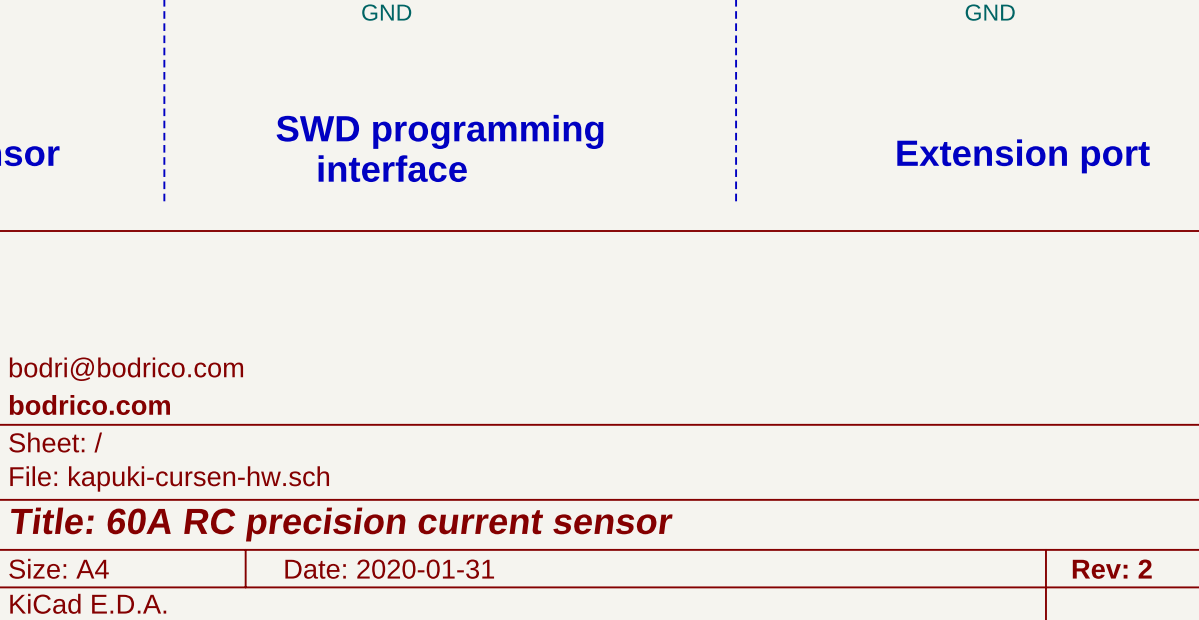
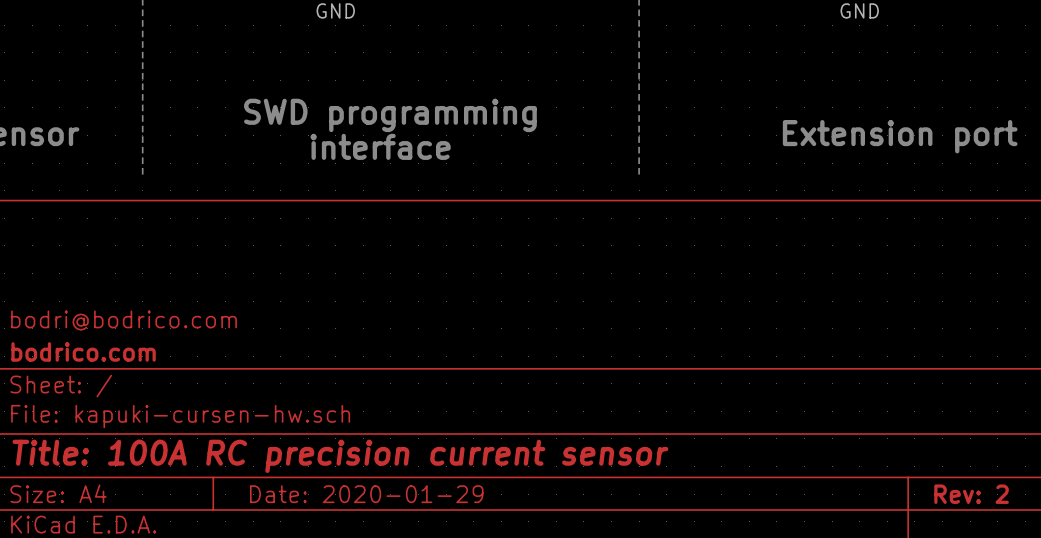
title block: Title: 60A RC precision current sensor (341, 524) -> Title: 100A RC precision current sensor (340, 456)
title block: Date: 2020-01-31 (389, 569) -> Date: 2020-01-29 (366, 494)

